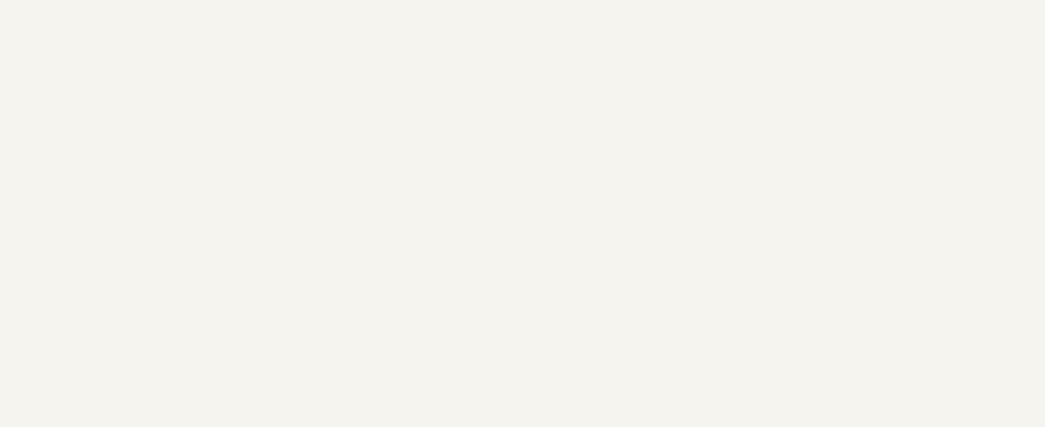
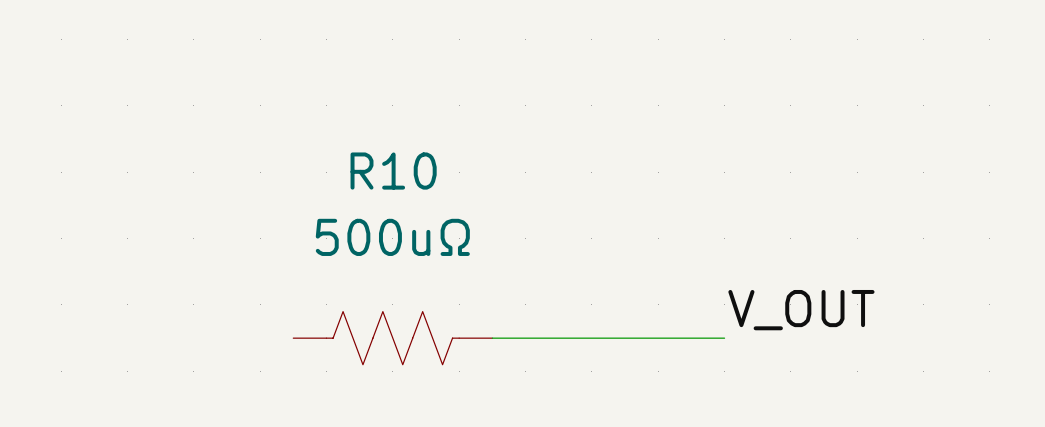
label: none -> V_OUT (801, 310)
R10: none -> 500uΩ (392, 338)
wire: none -> (492, 338) (724, 338)

